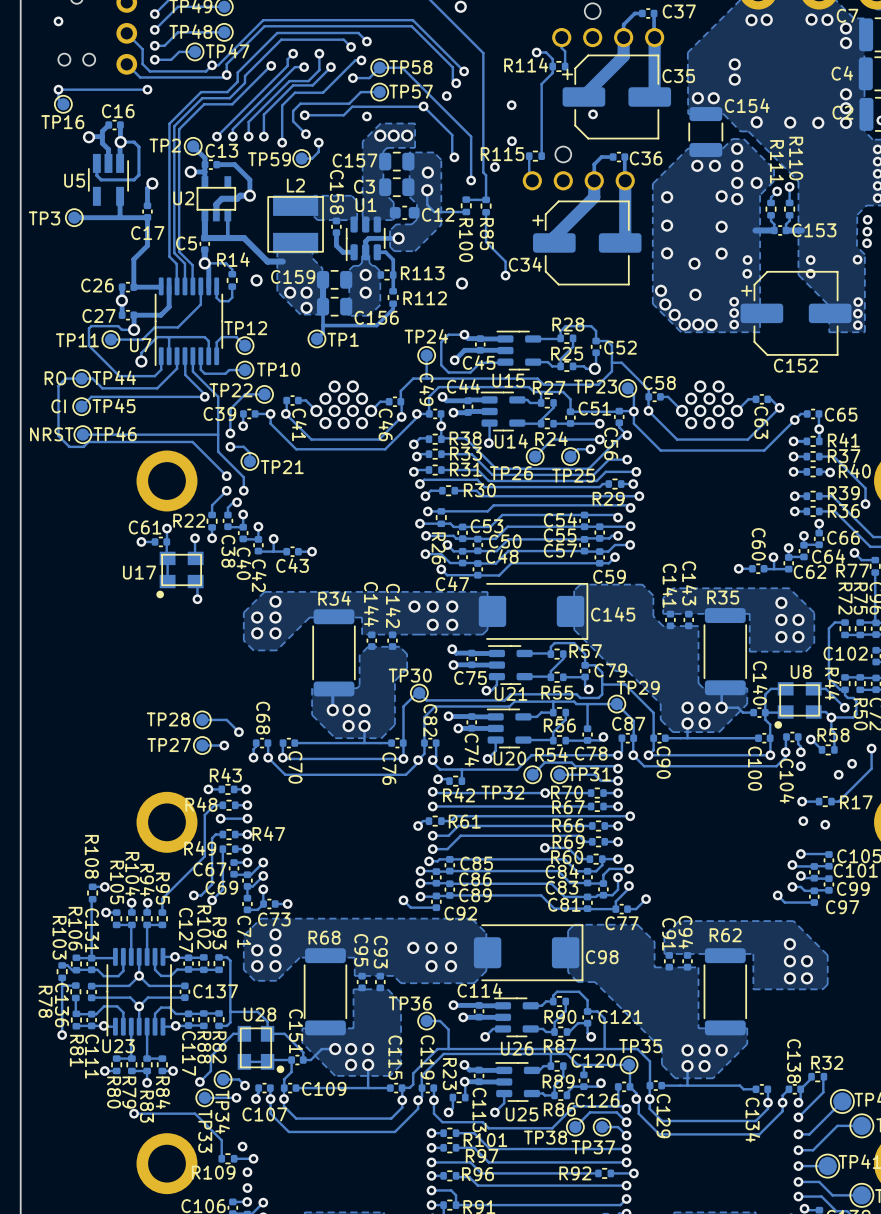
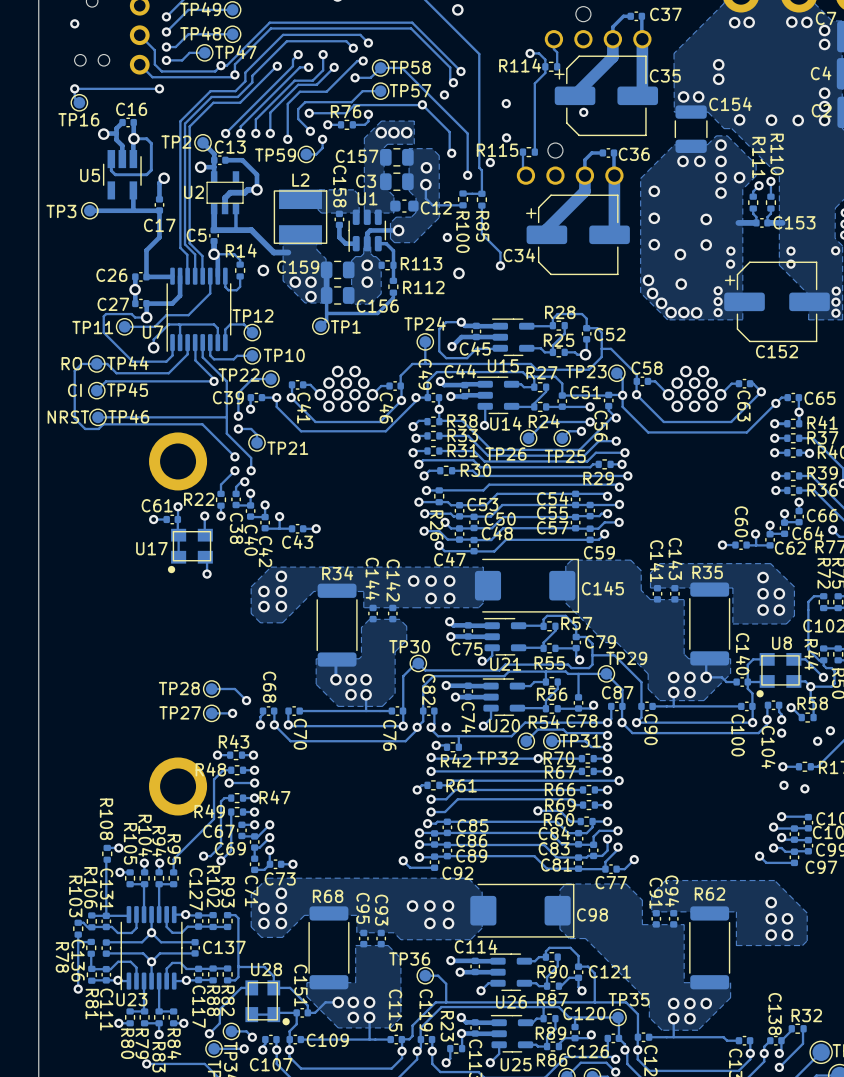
track: none -> (368, 114) (368, 121) (364, 124) (352, 124)
via: none -> (327, 124)
track: none -> (341, 124) (327, 124)
R76: none -> (346, 124)
via: (721, 196) -> none
via: none -> (447, 237)

